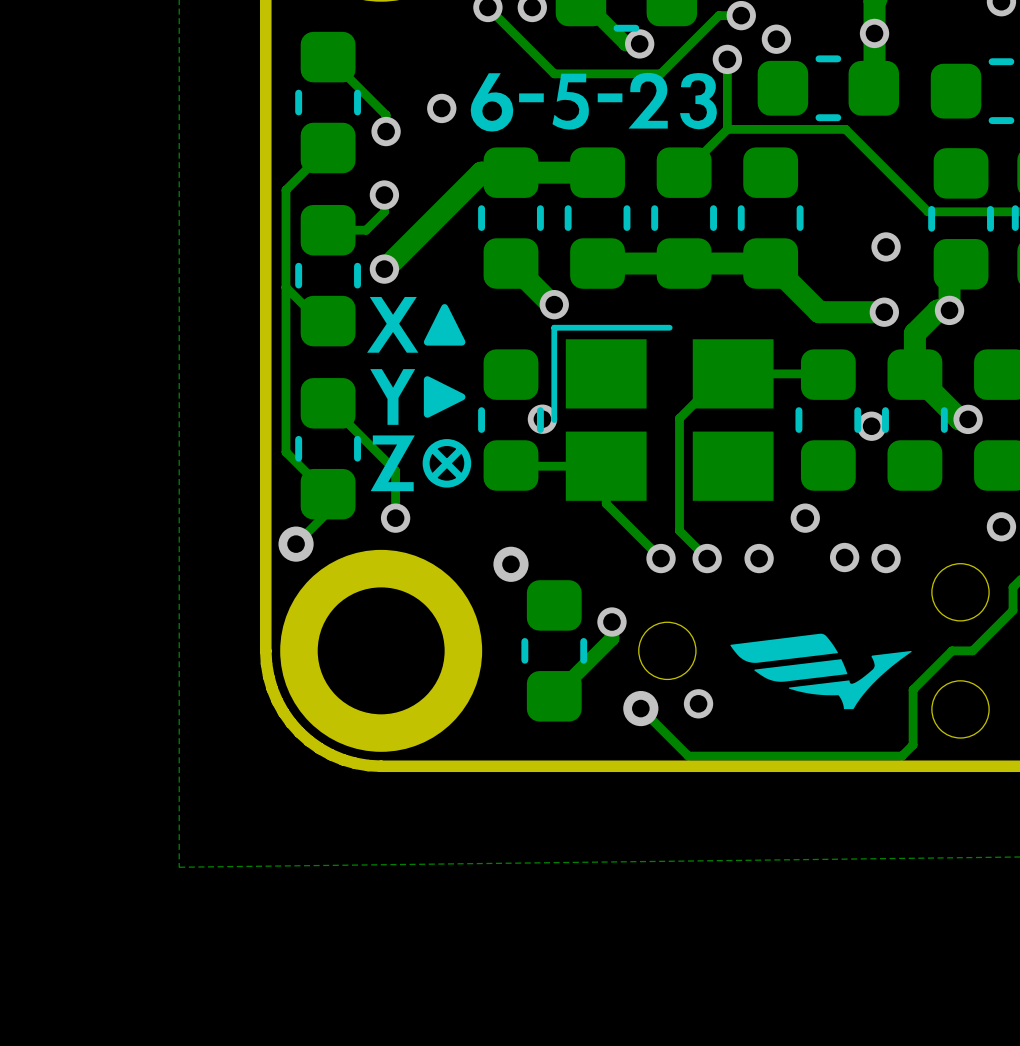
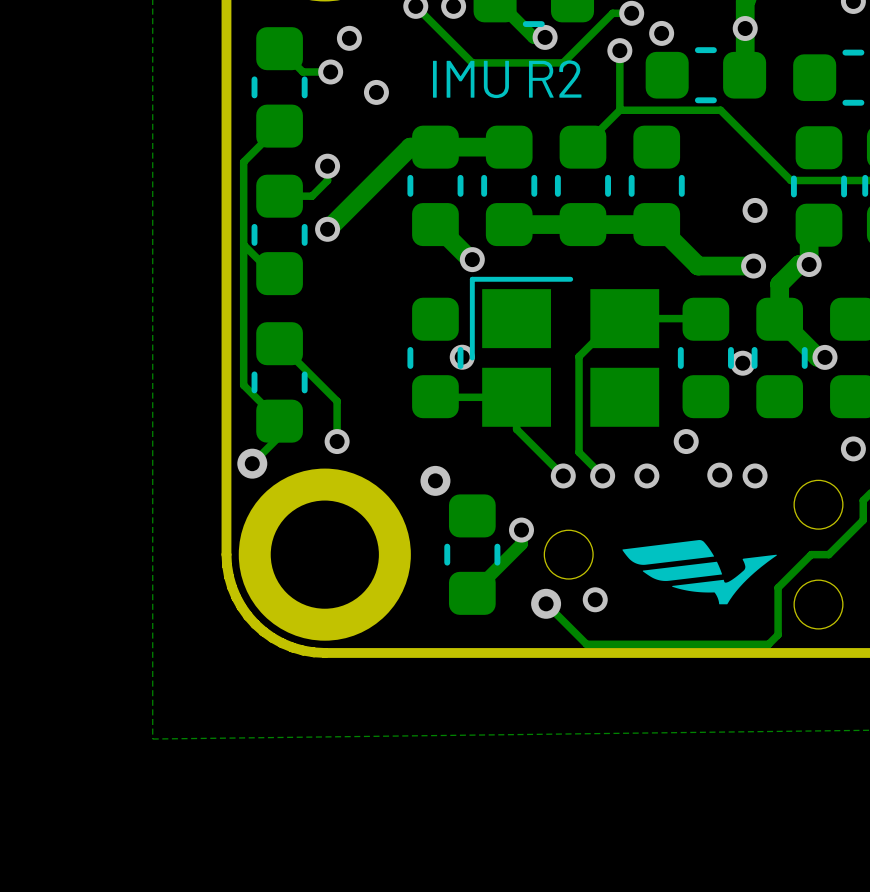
via: none -> (349, 38)
drawing: [470, 72, 717, 132] -> none
track: (355, 84) (386, 115) (386, 131) -> (302, 71) (330, 71)
via: none -> (330, 71)
text: none -> IMU R2 (507, 79)
via: (386, 131) -> none
drawing: [367, 296, 472, 492] -> none
line: (432, 448) (461, 477) -> none
line: (461, 448) (432, 477) -> none

